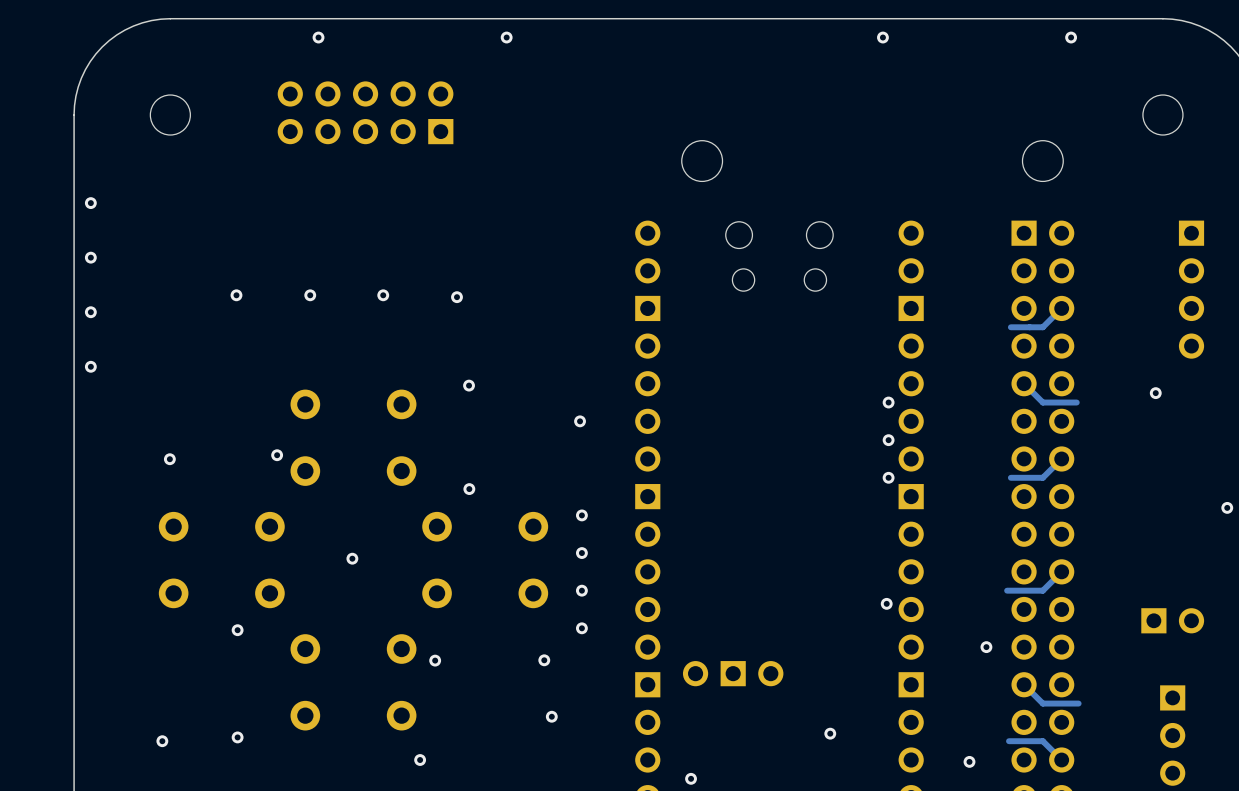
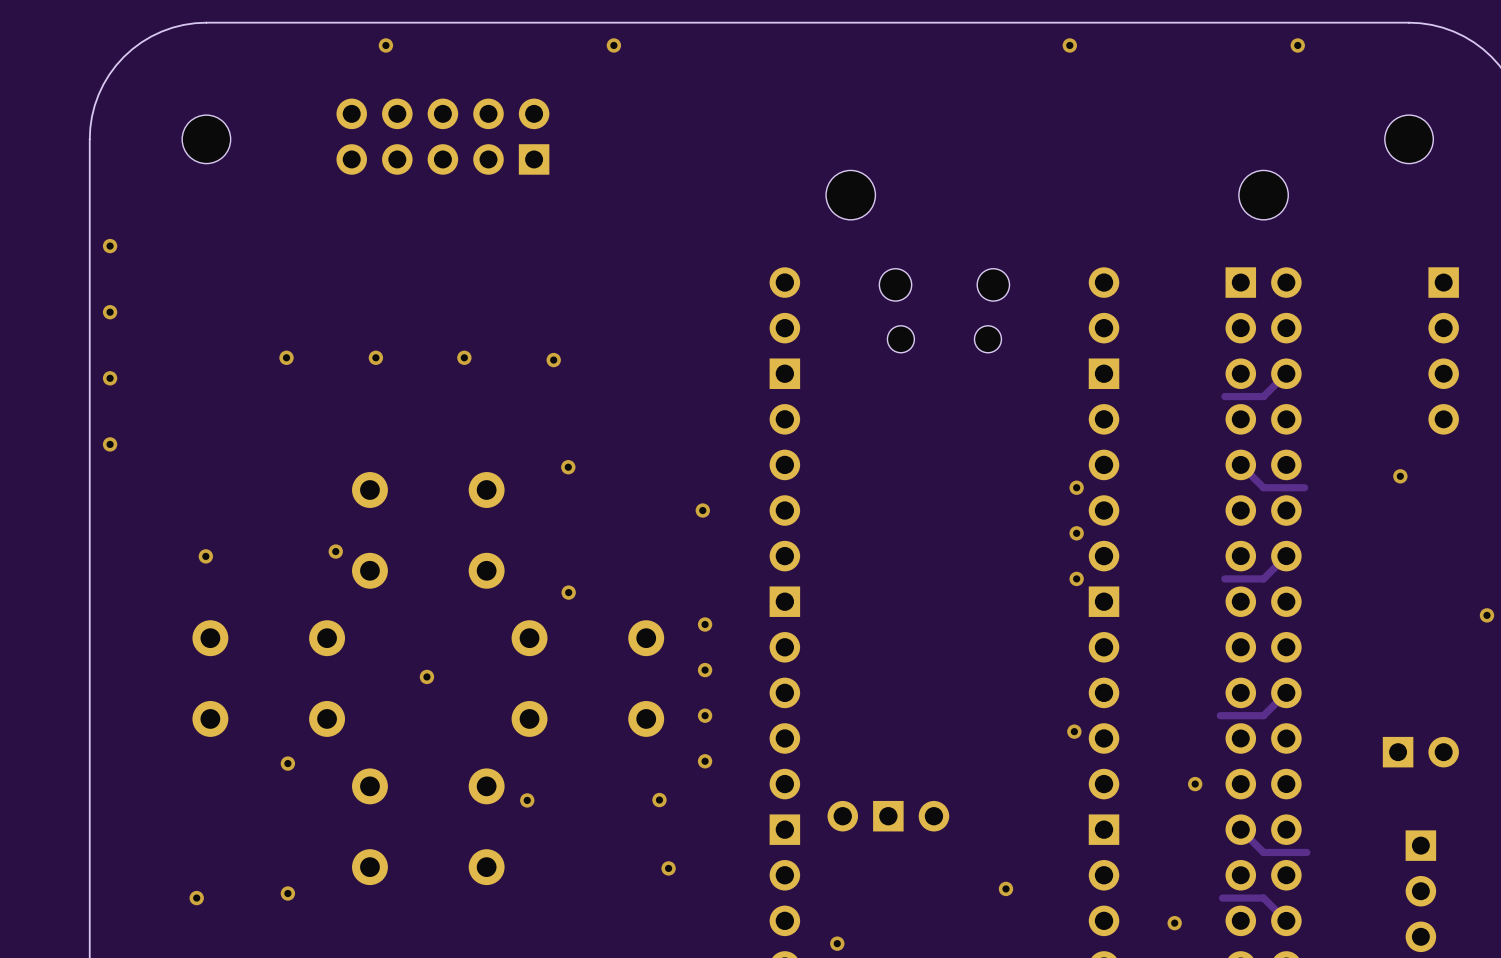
via: (420, 760) -> none

